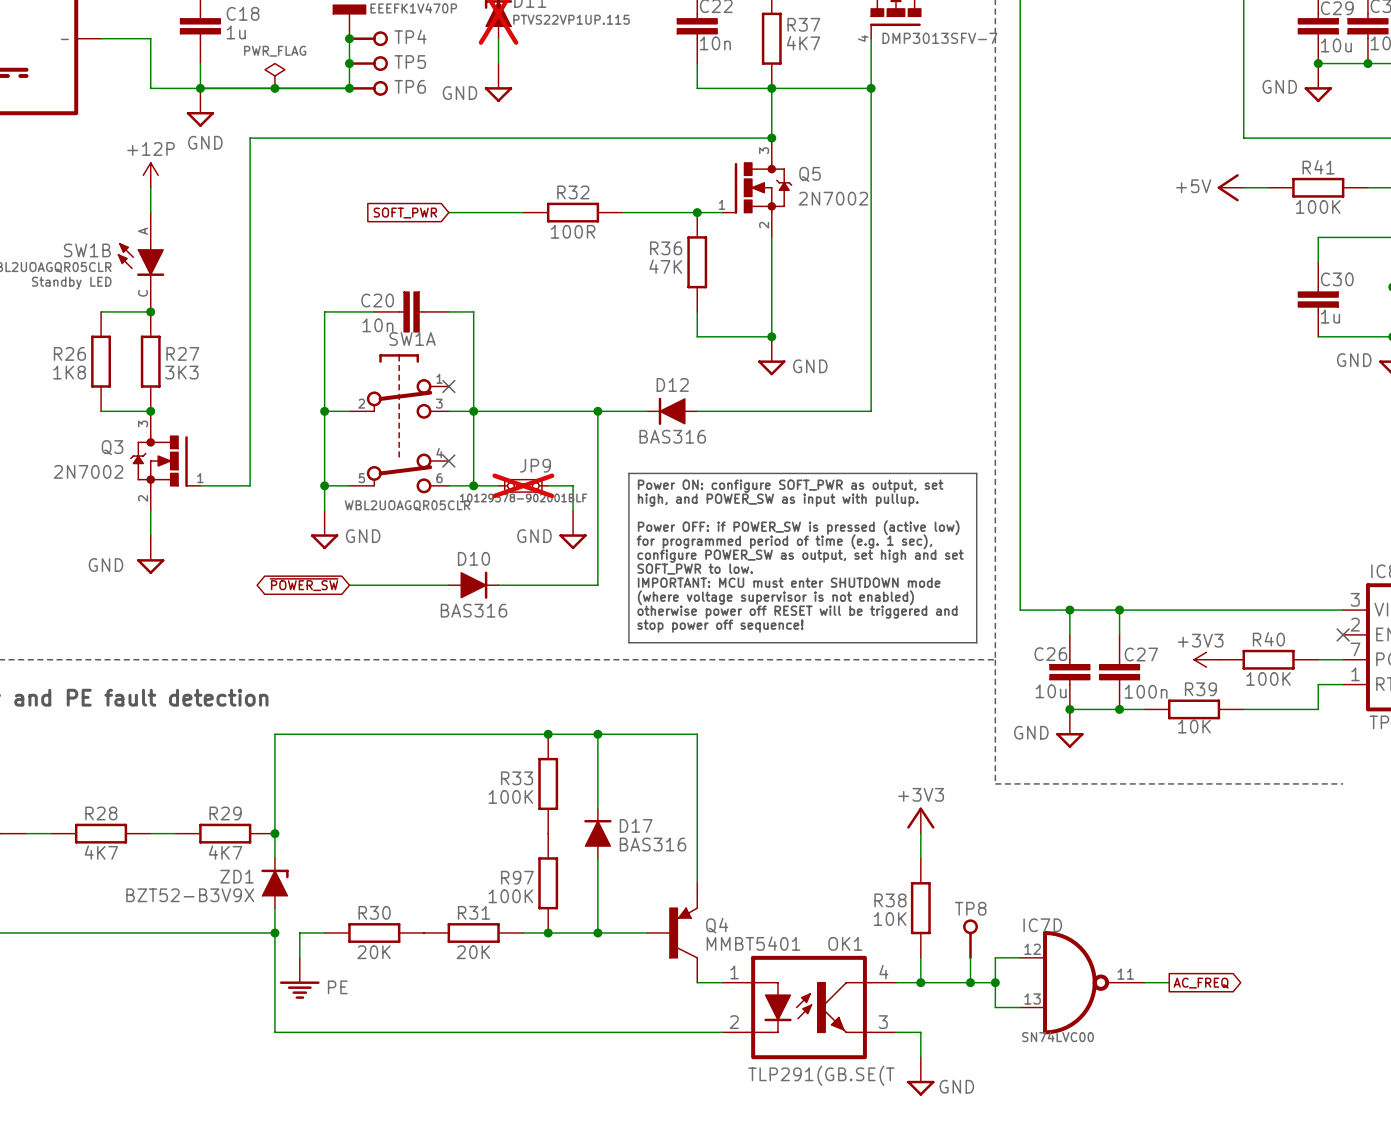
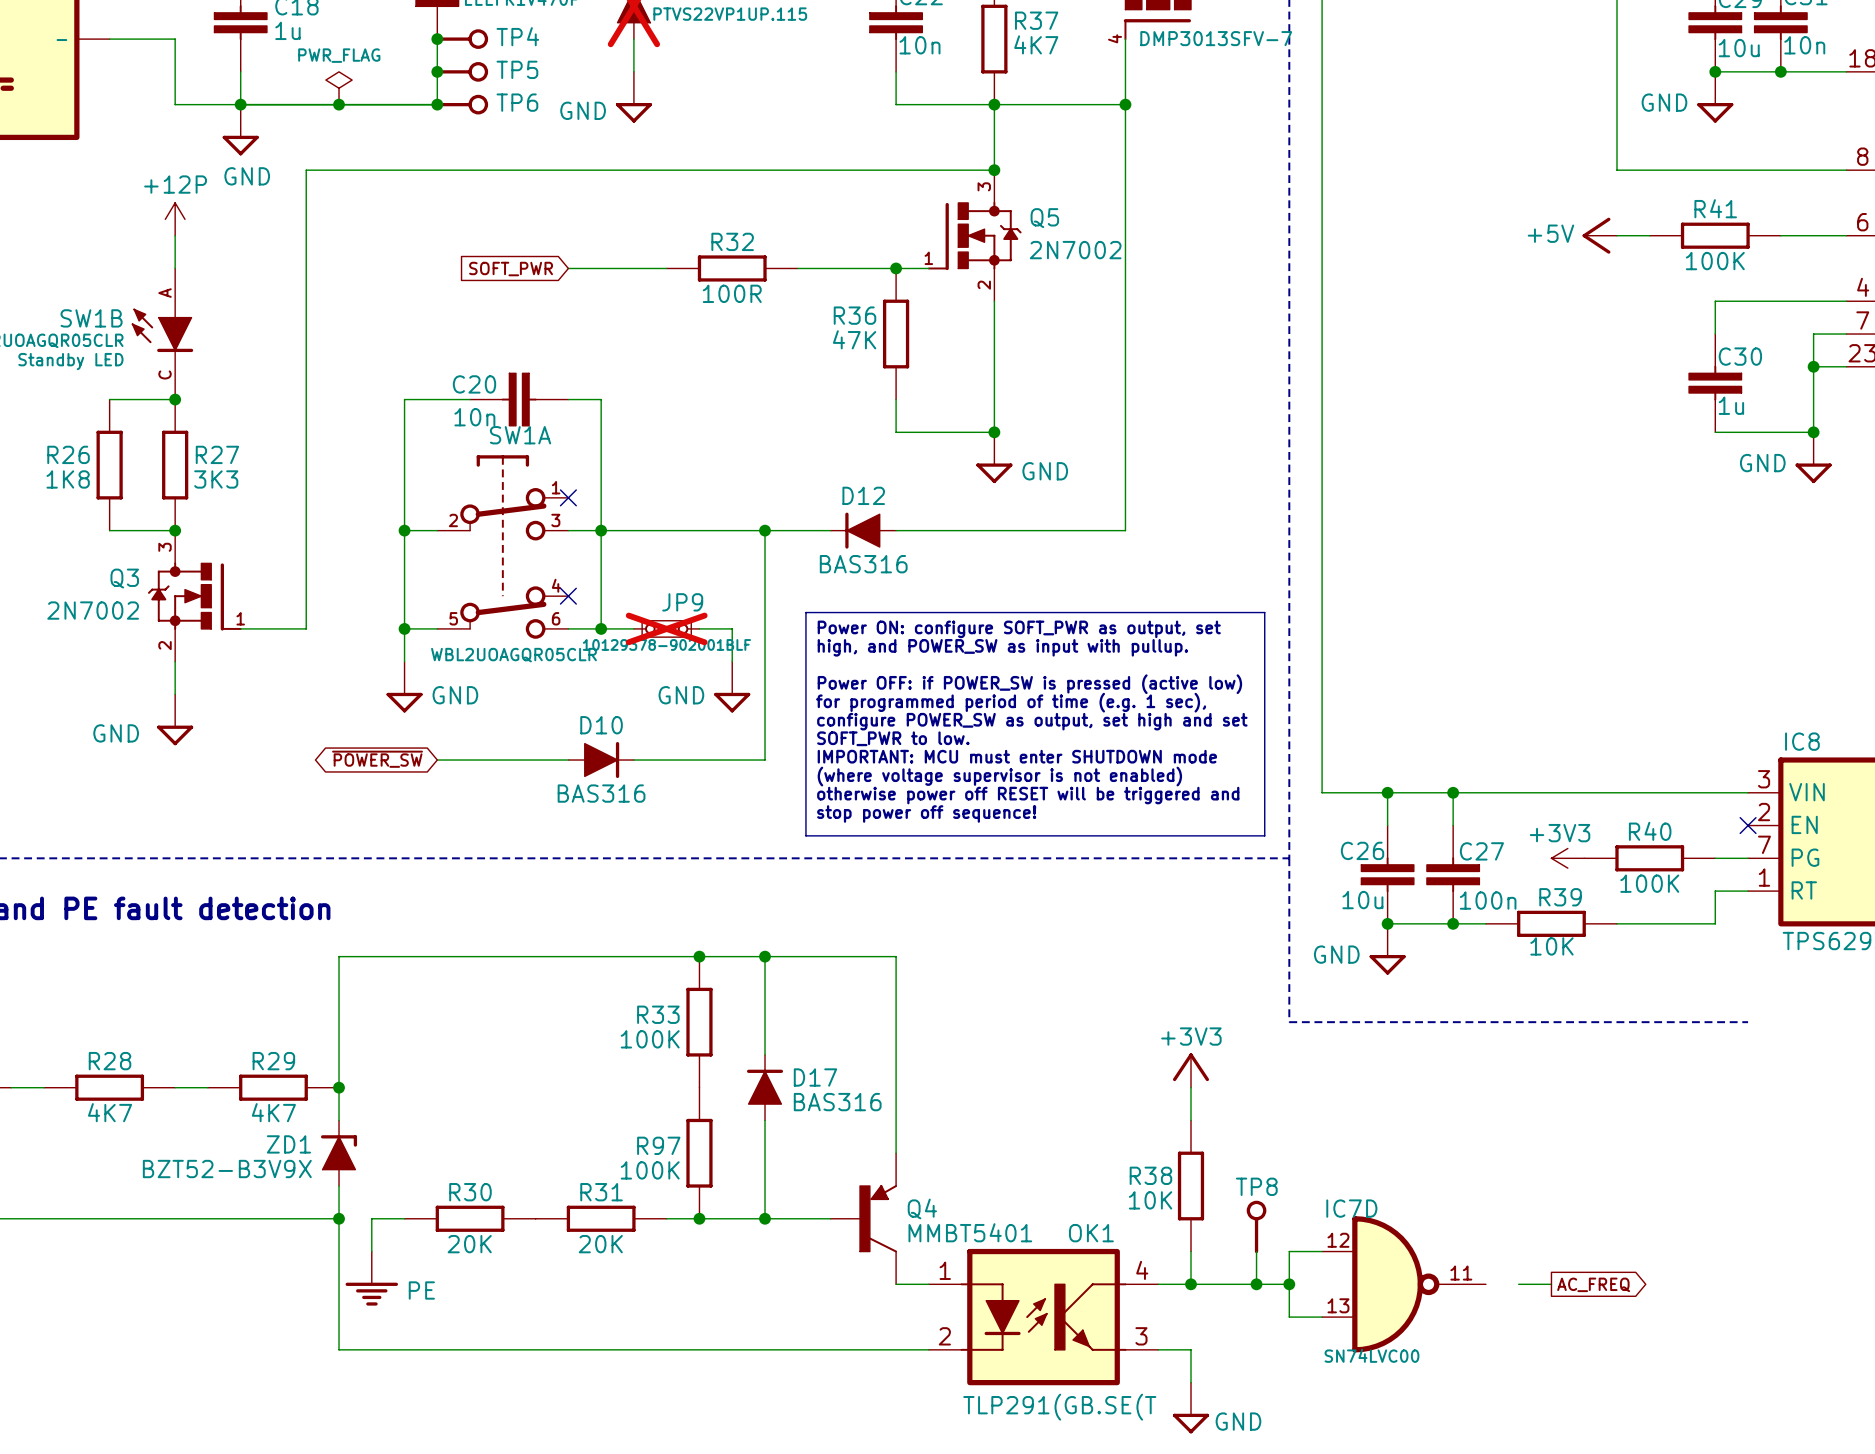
wire: (1144, 982) (1169, 982) -> (1551, 1284) (1518, 1284)
global label position: AC_FREQ (1201, 983) -> AC_FREQ (1593, 1284)

